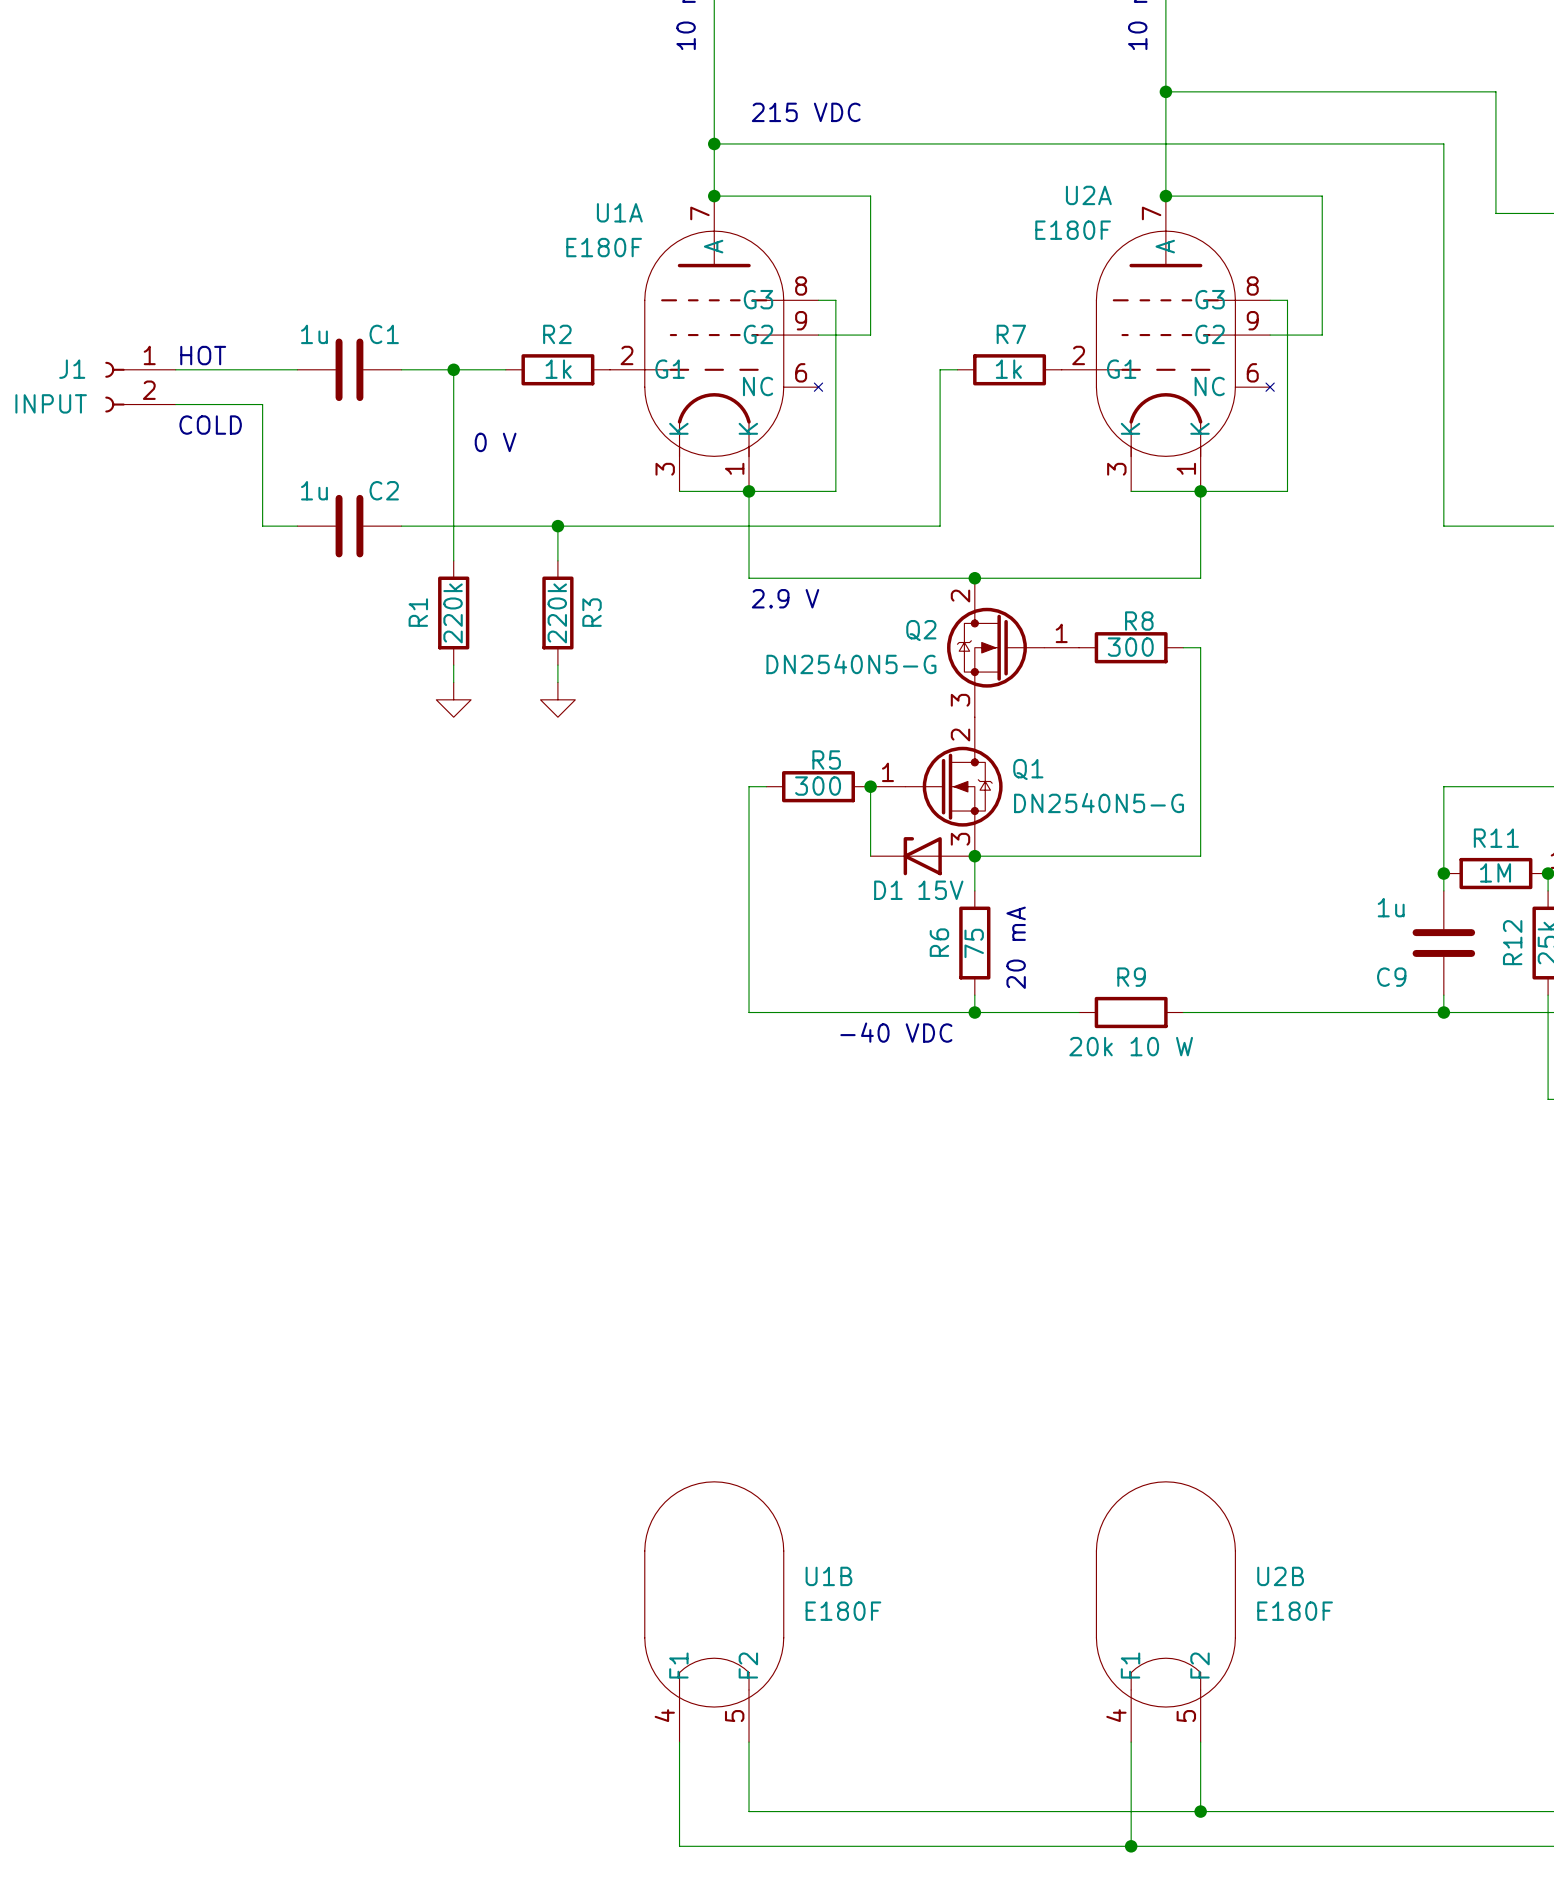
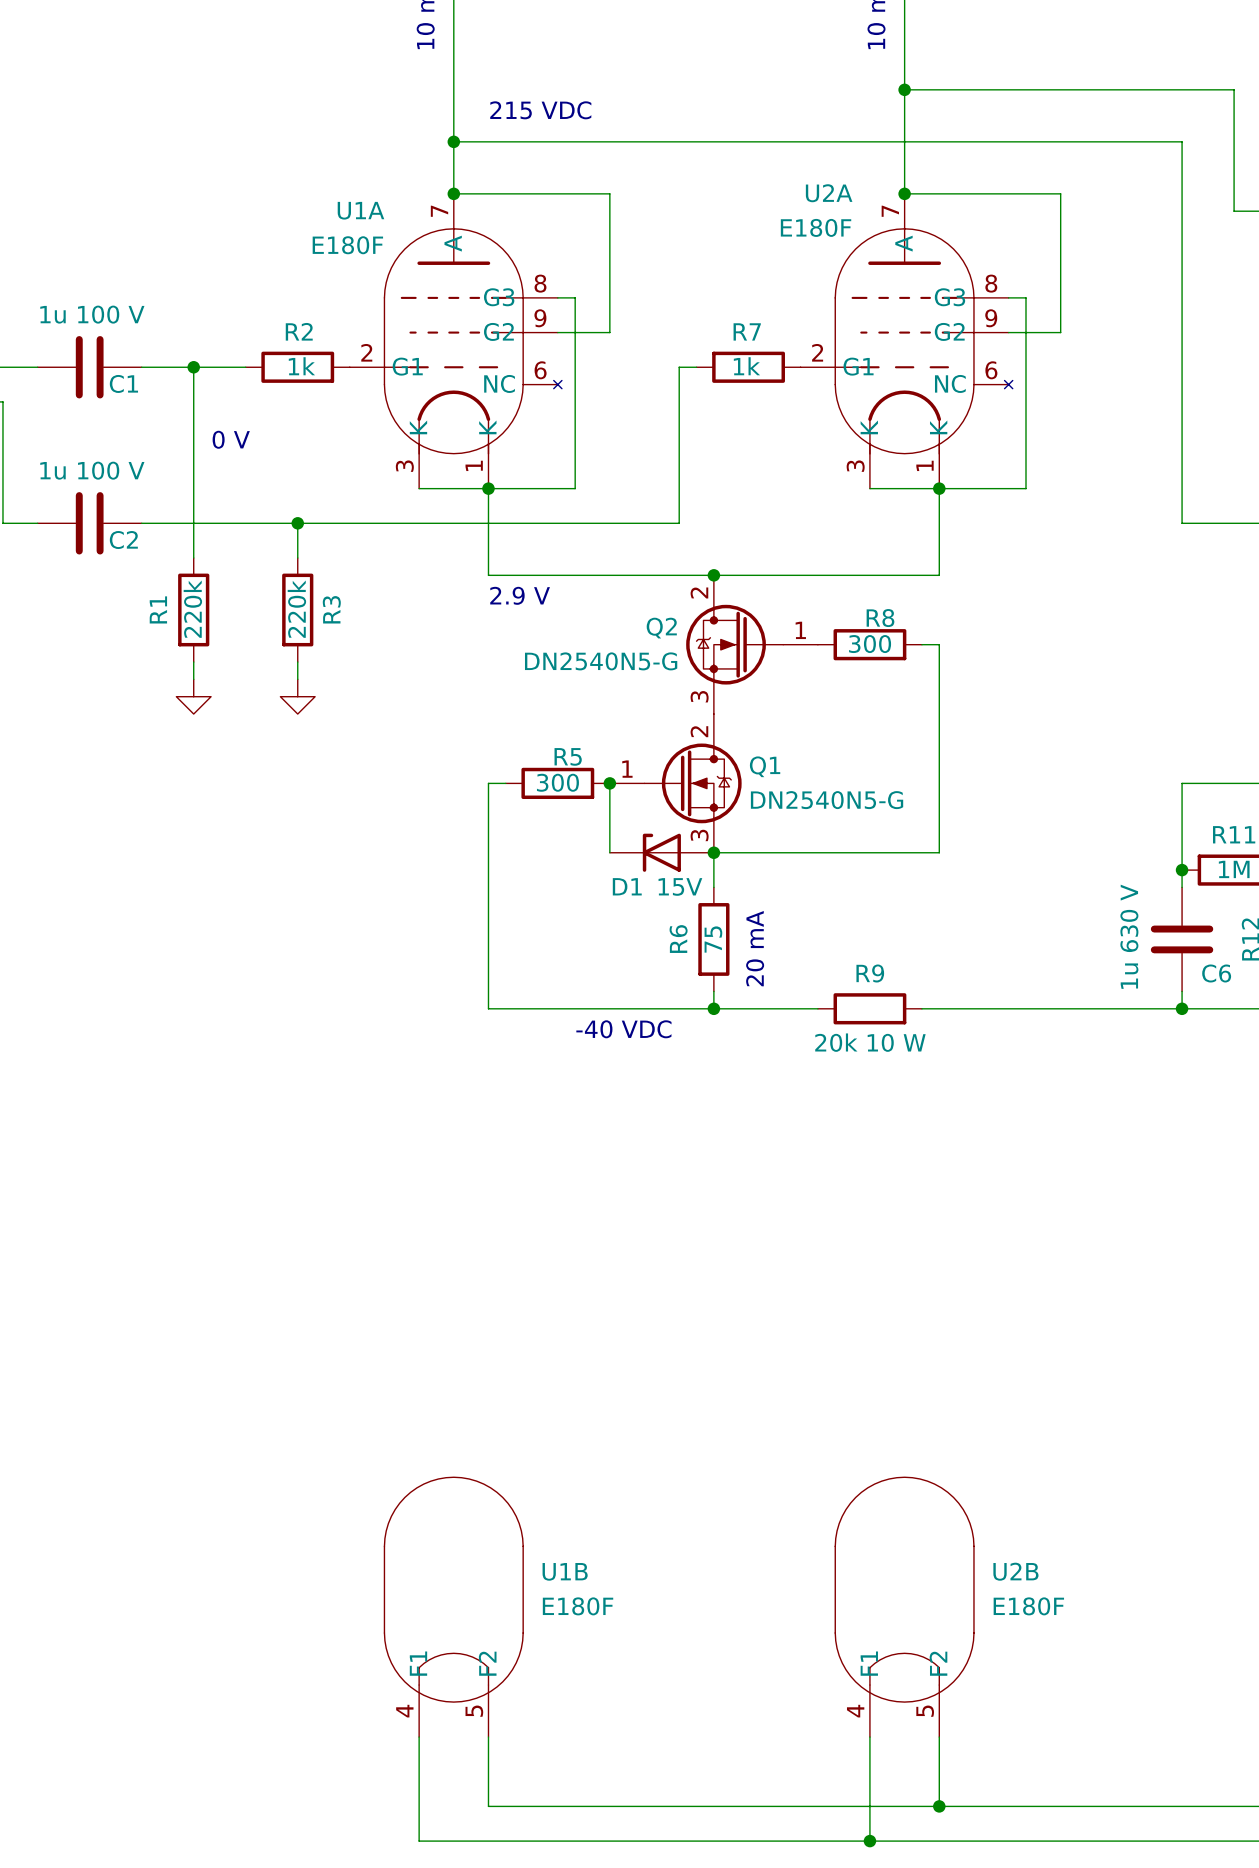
C1 value: 1u (314, 334) -> 1u 100 V (92, 314)
C1 name position: C1 (384, 334) -> C1 (123, 383)
C2 value: 1u (314, 490) -> 1u 100 V (92, 470)
C2 name position: C2 (384, 490) -> C2 (123, 540)
C9 value: 1u (1391, 907) -> 1u 630 V (1129, 936)
C9 name: C9 (1391, 977) -> C6 (1216, 973)

